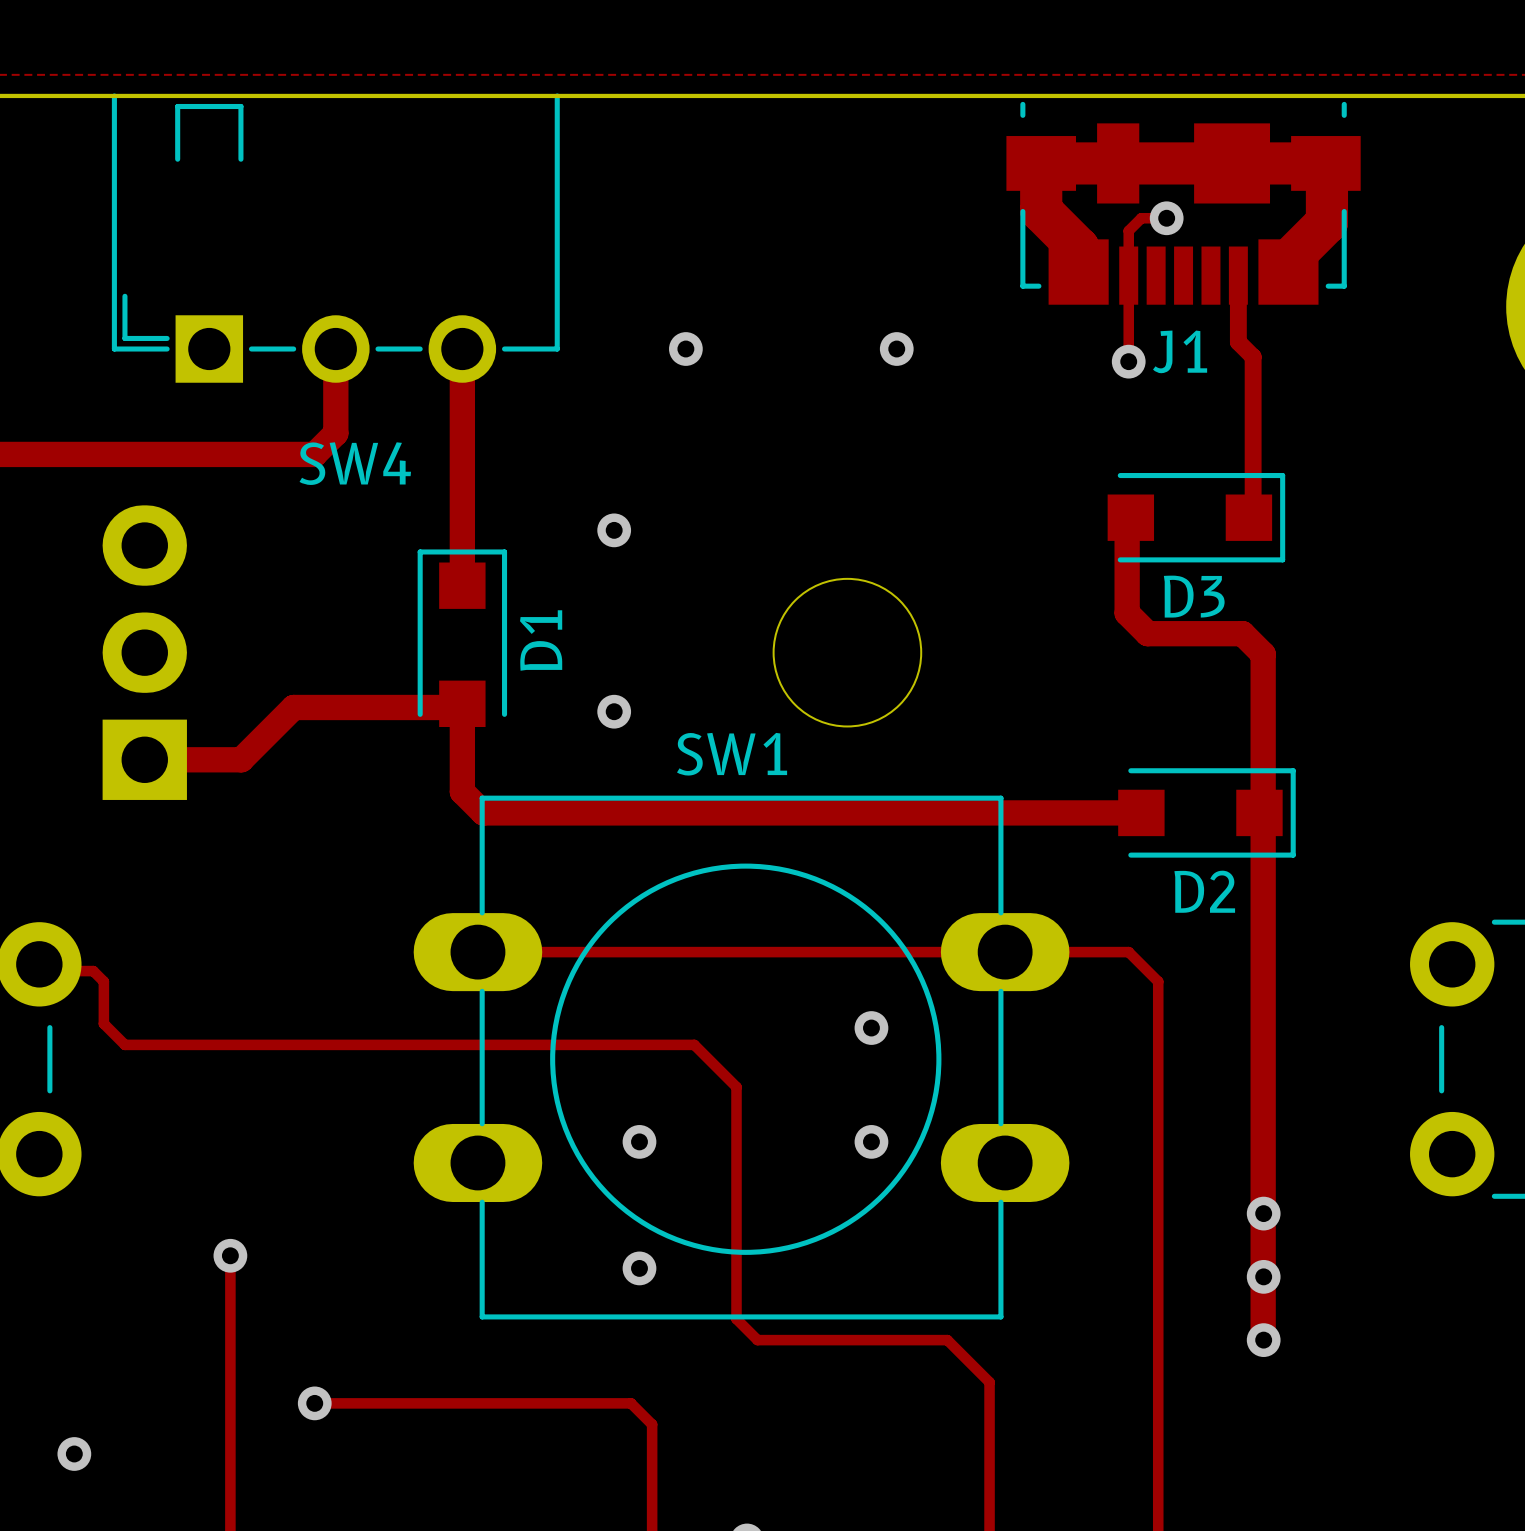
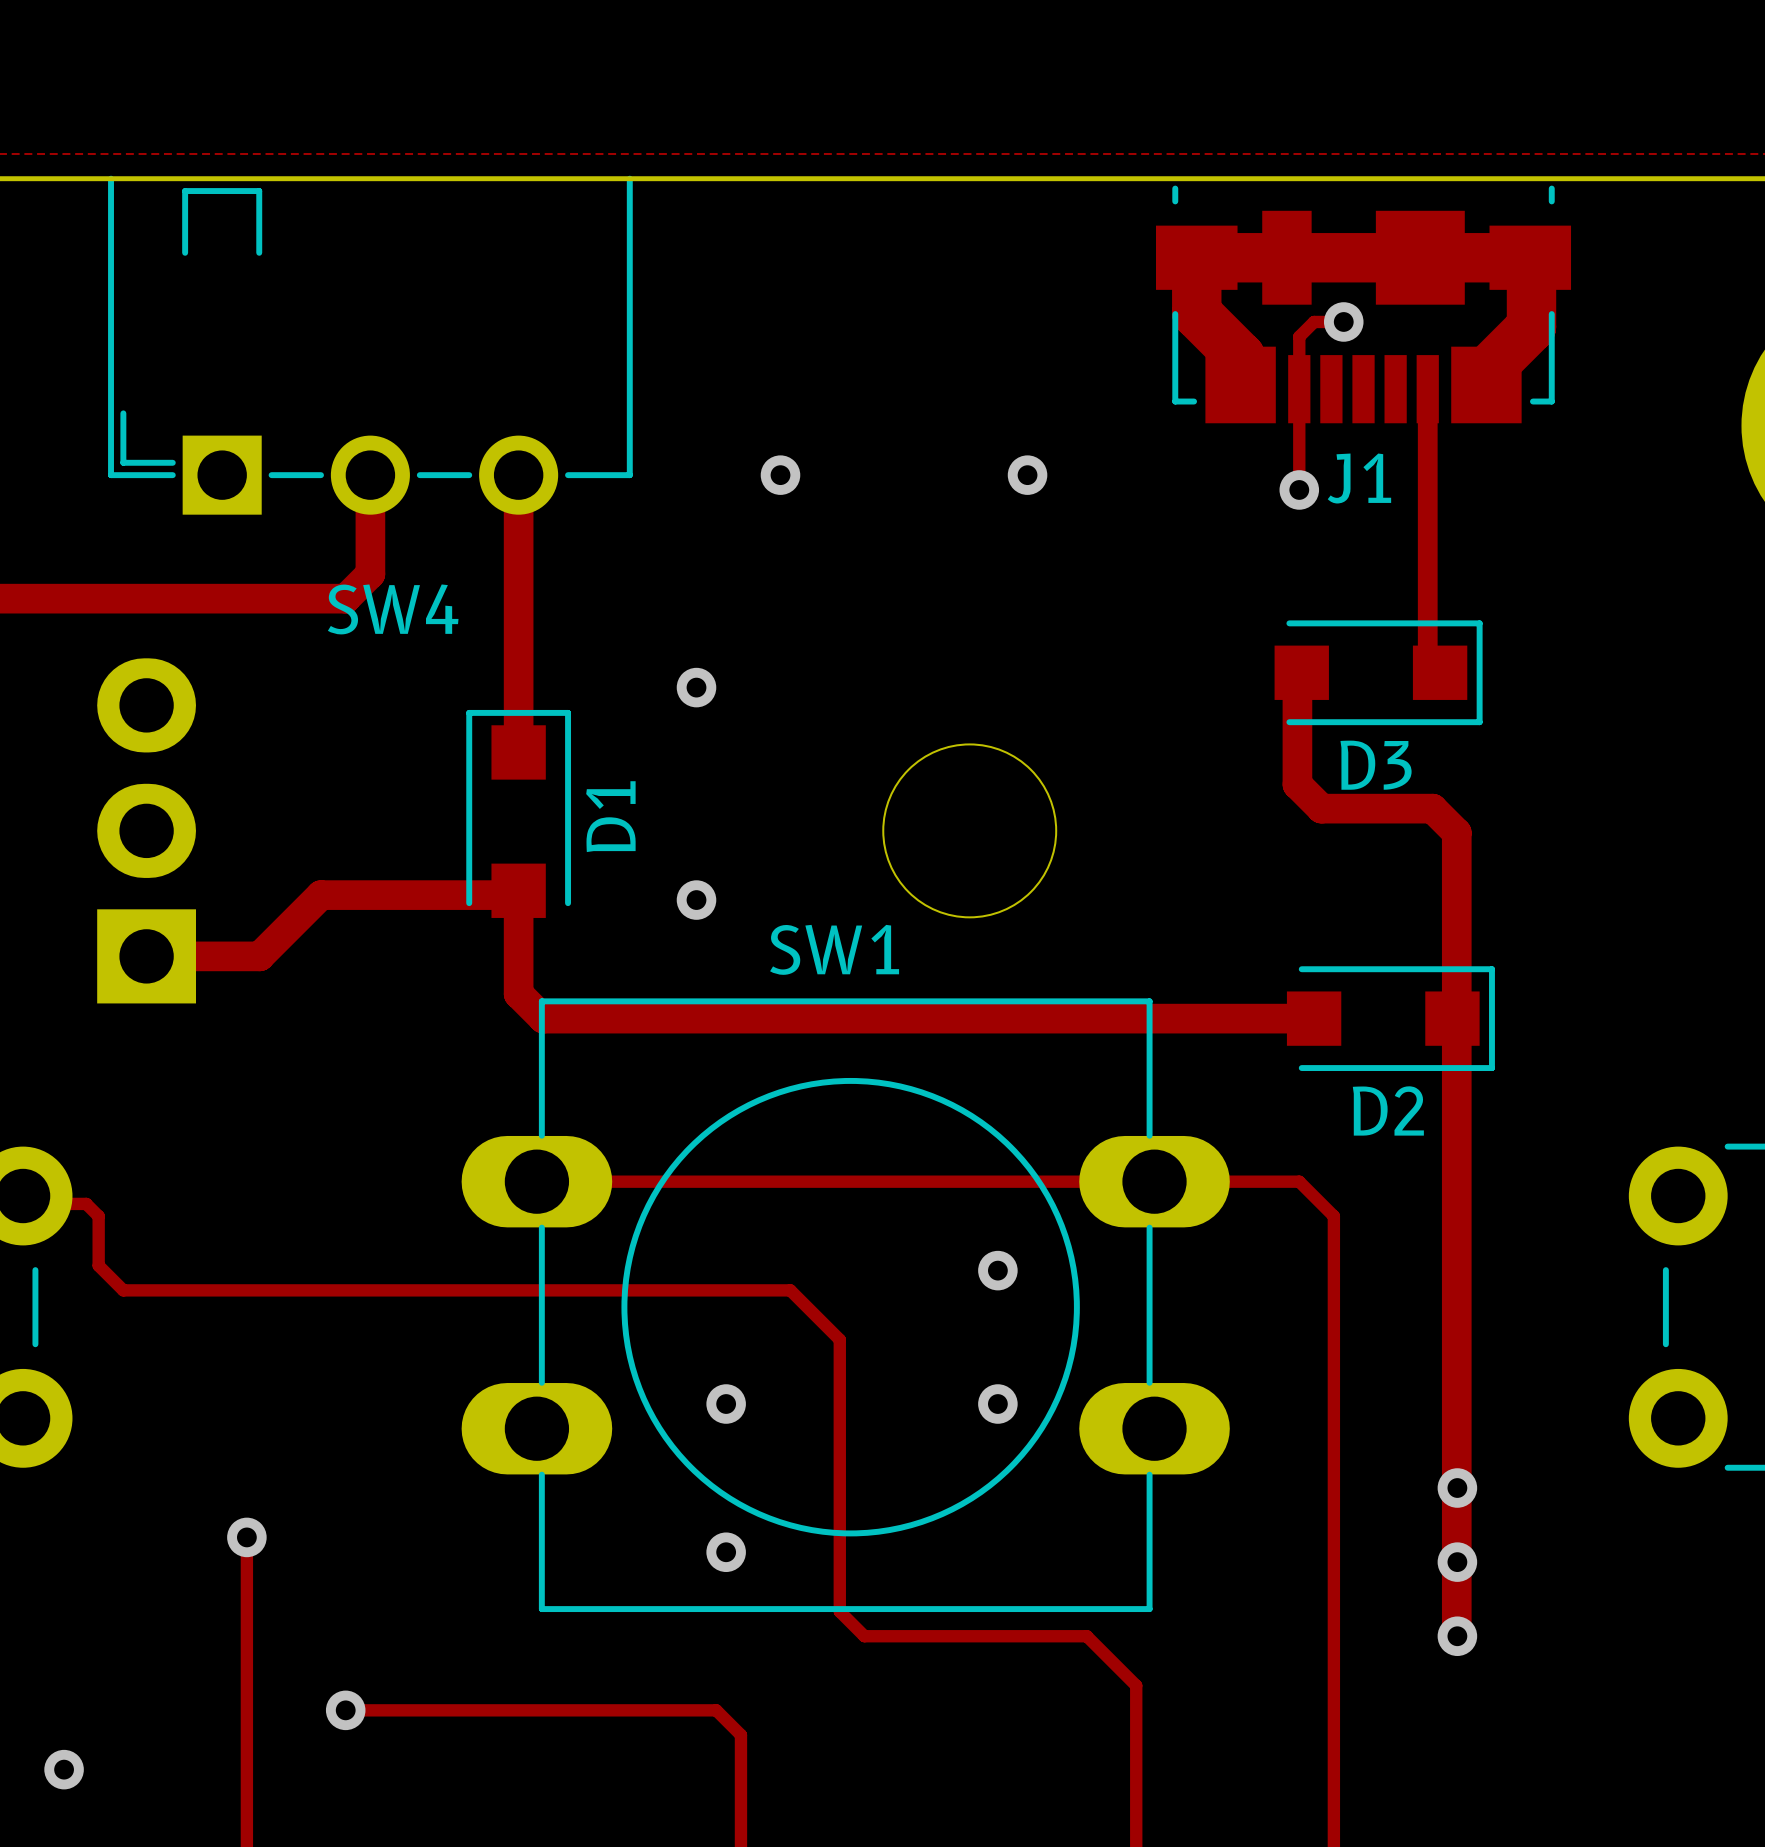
track: (1238, 342) (1253, 356) (1253, 507) (1242, 517) -> (1427, 467) (1427, 667)

